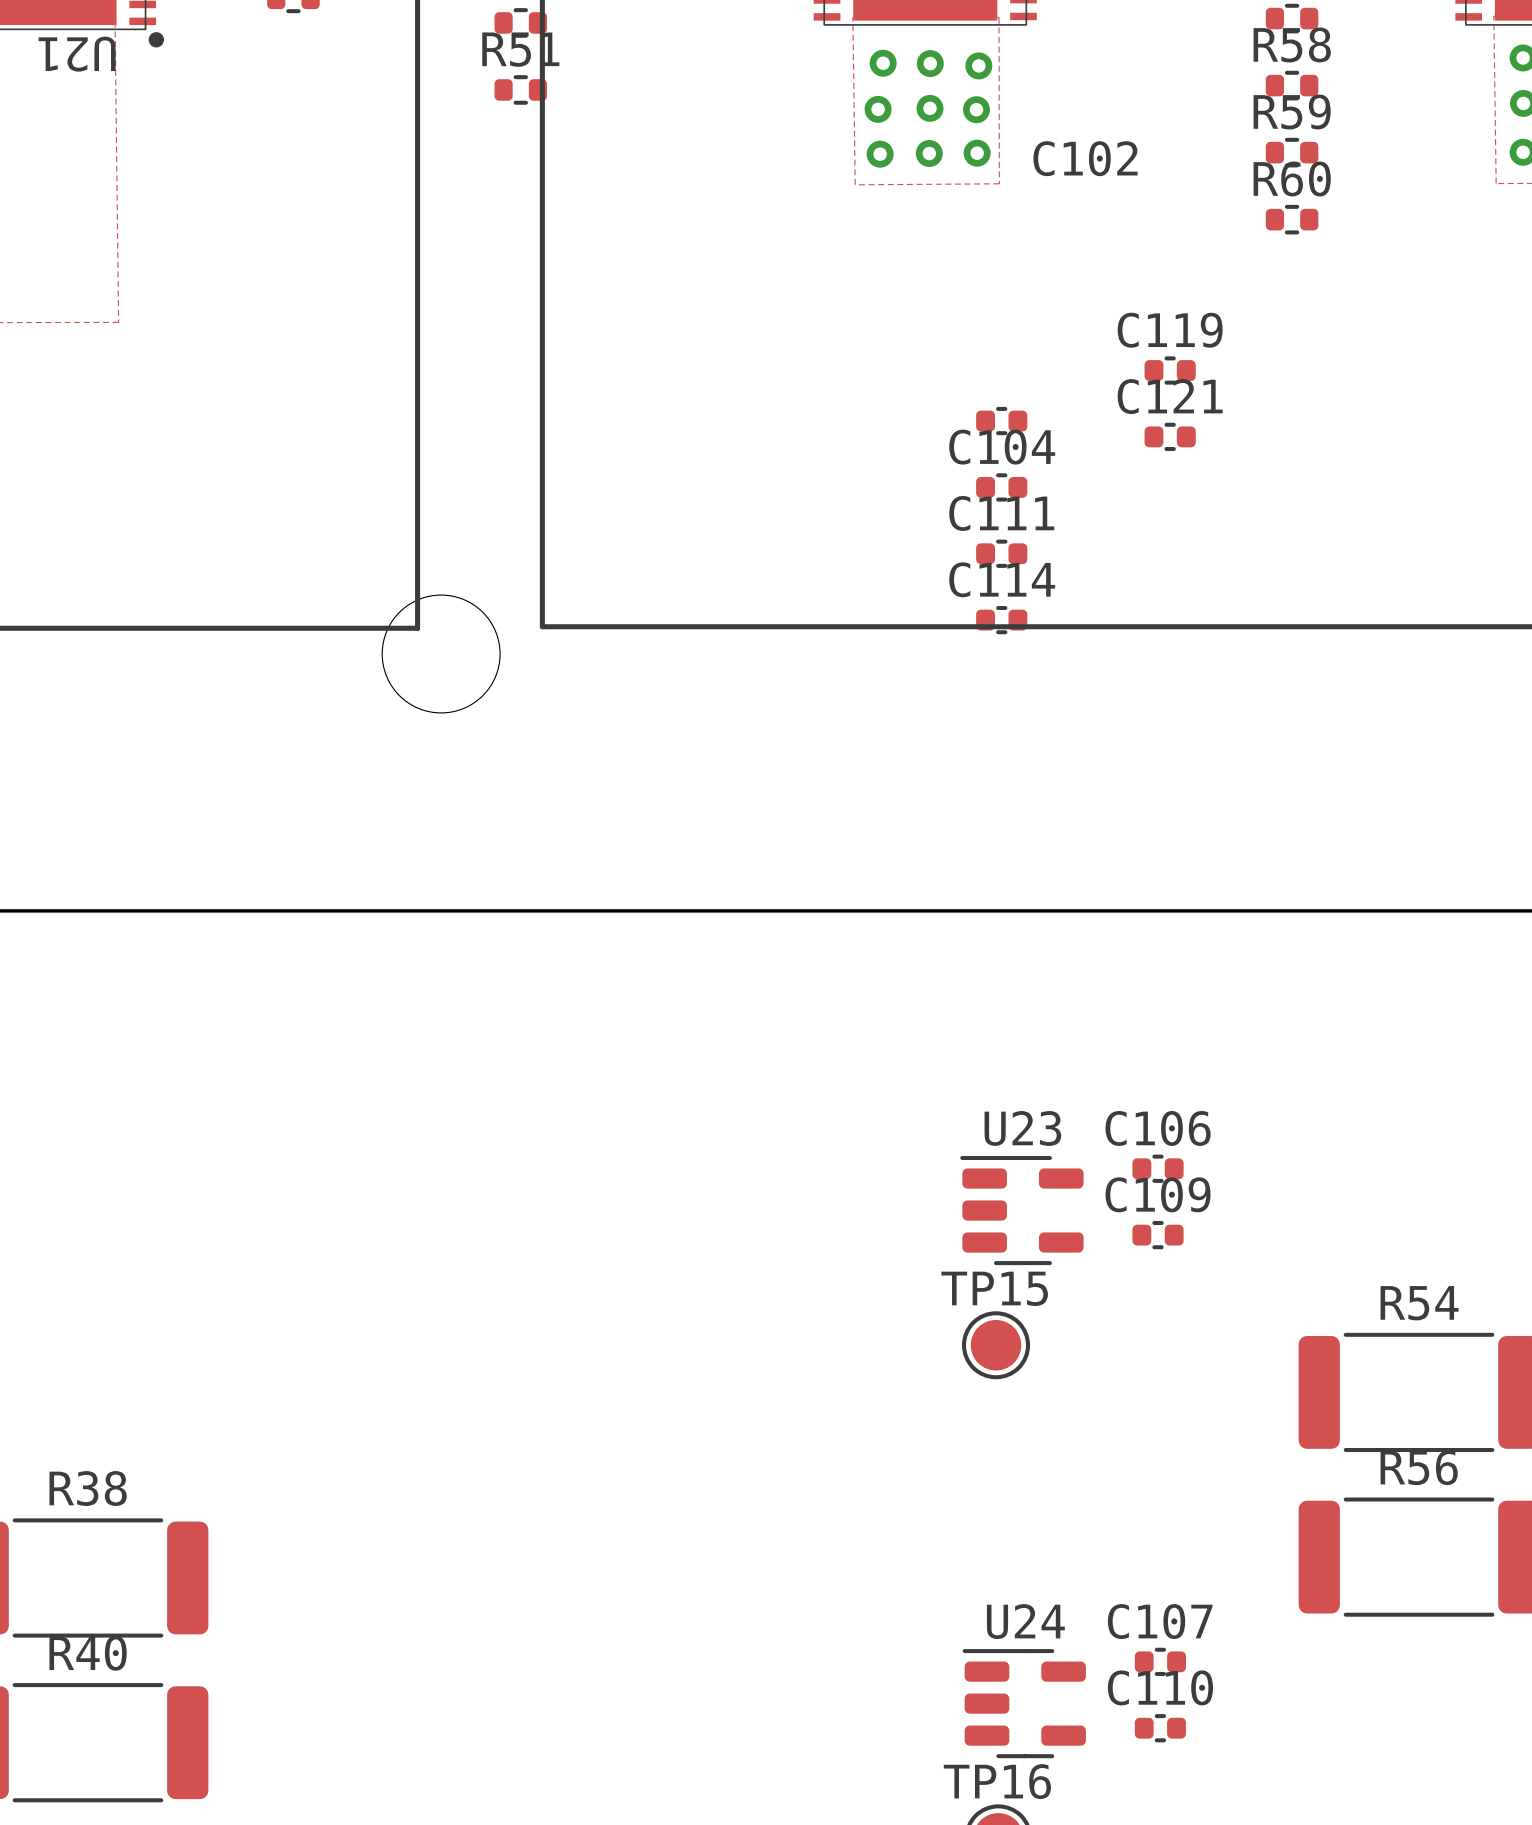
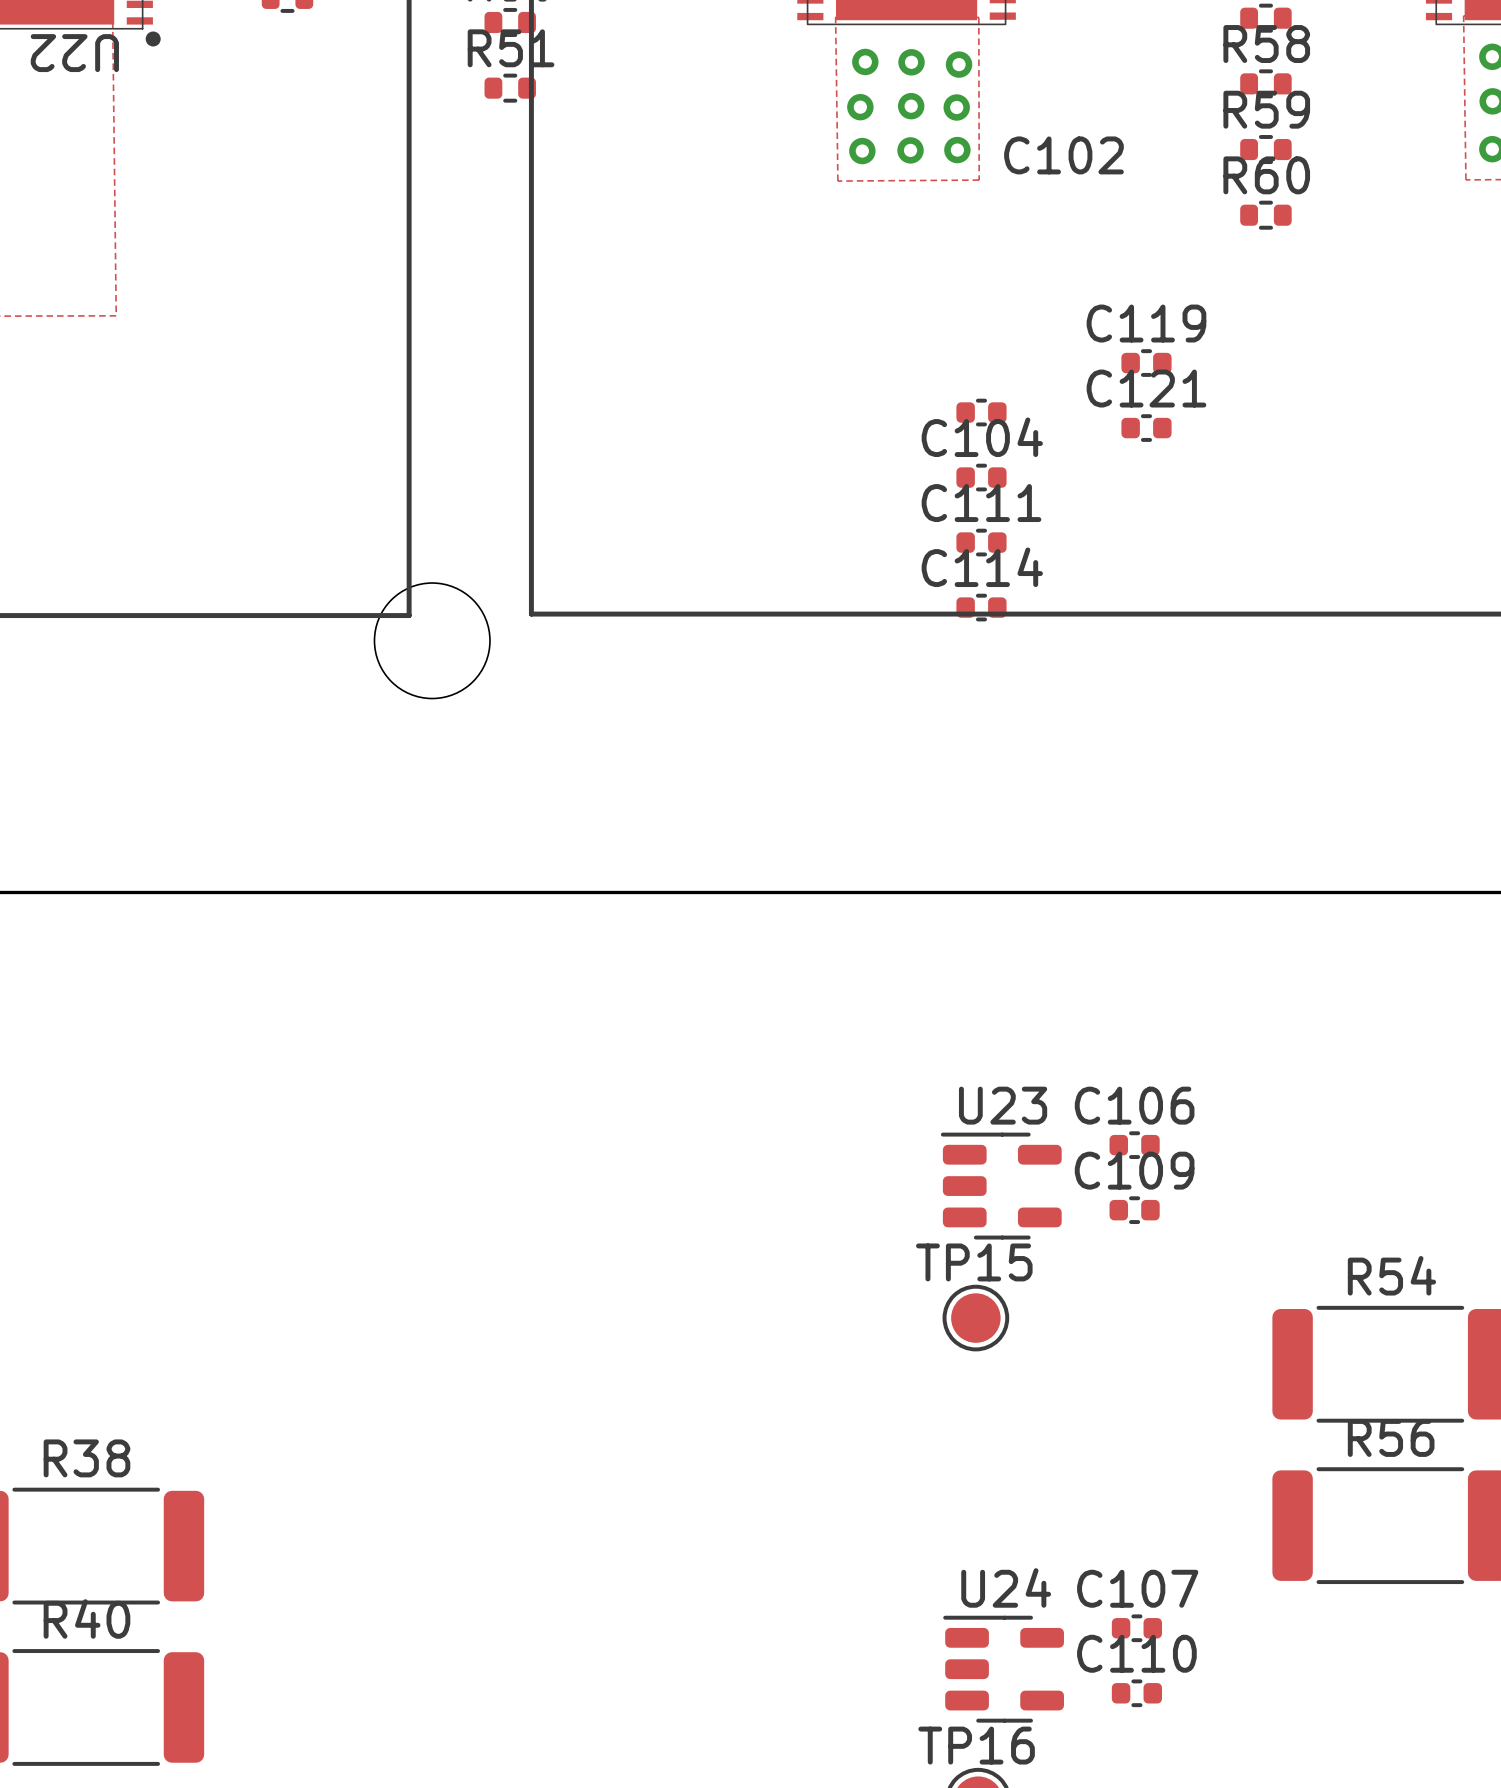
U21 name: U21 (77, 54) -> U22 (74, 53)

